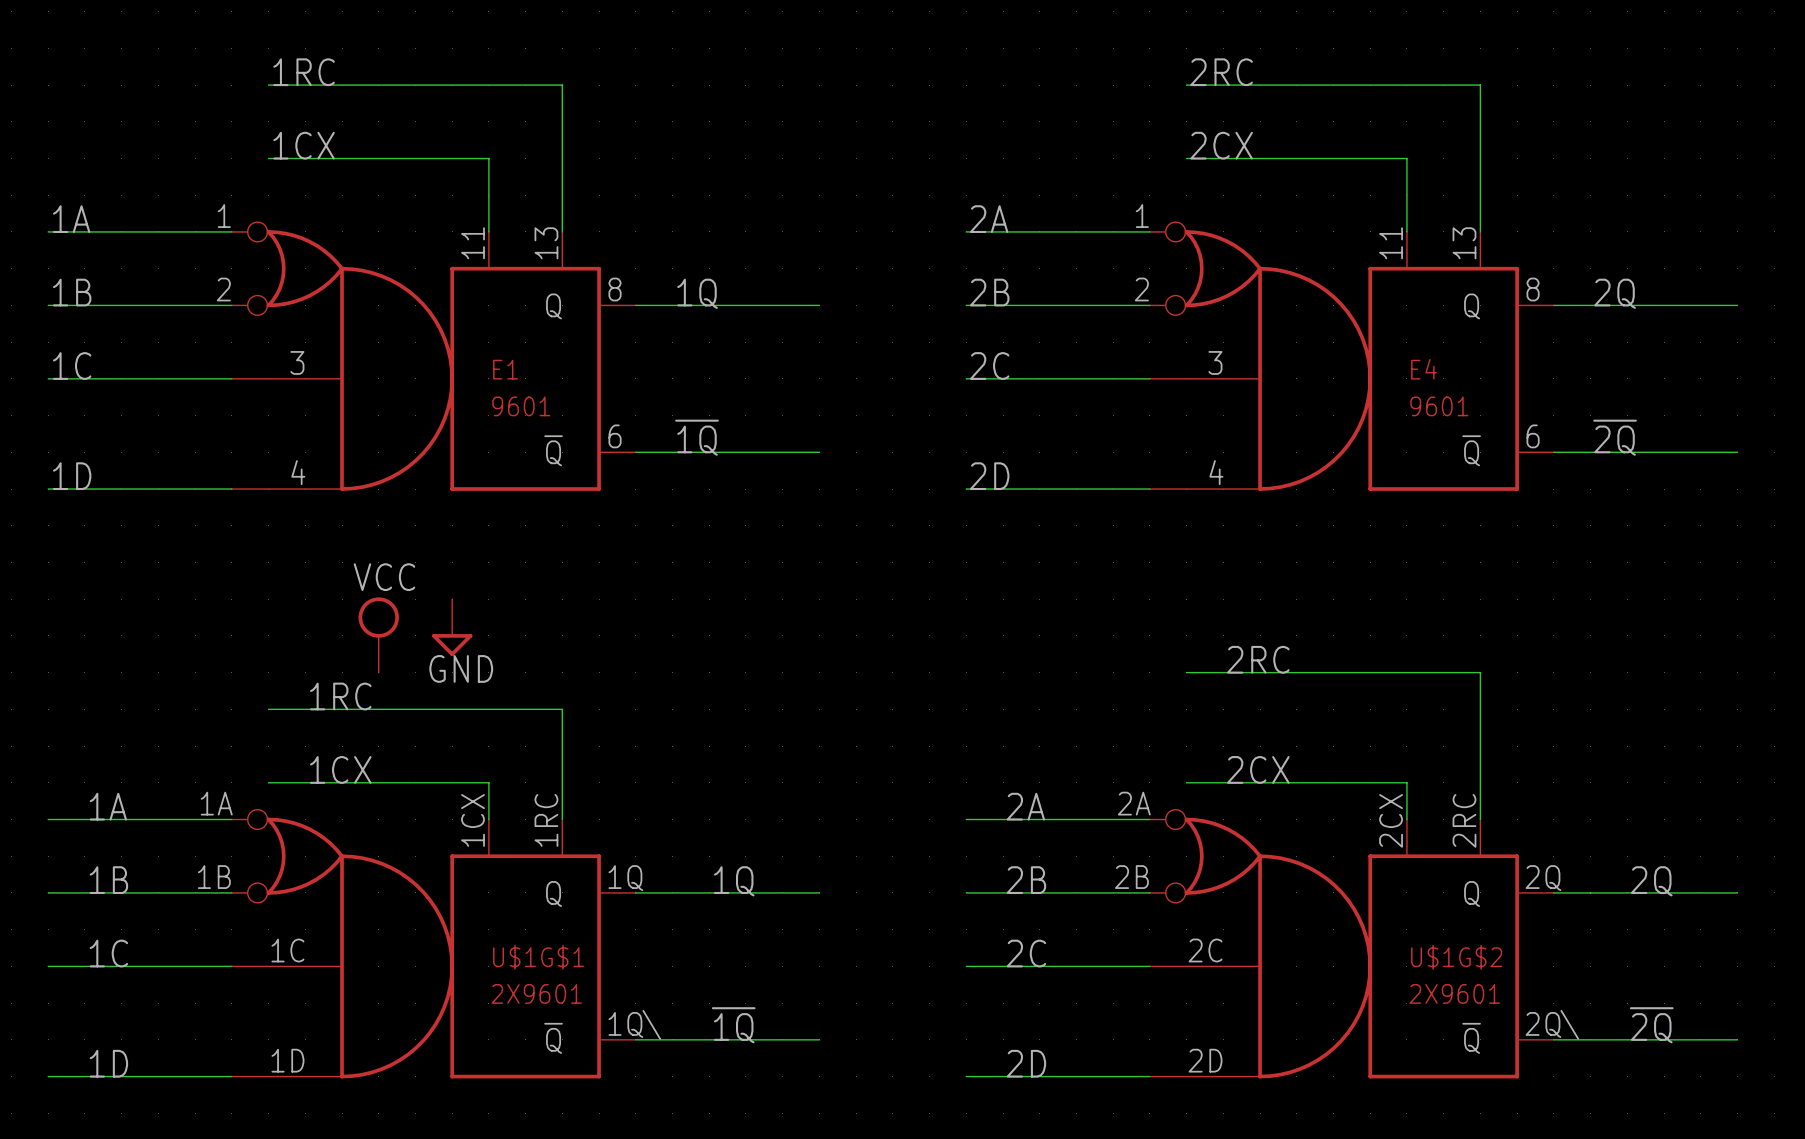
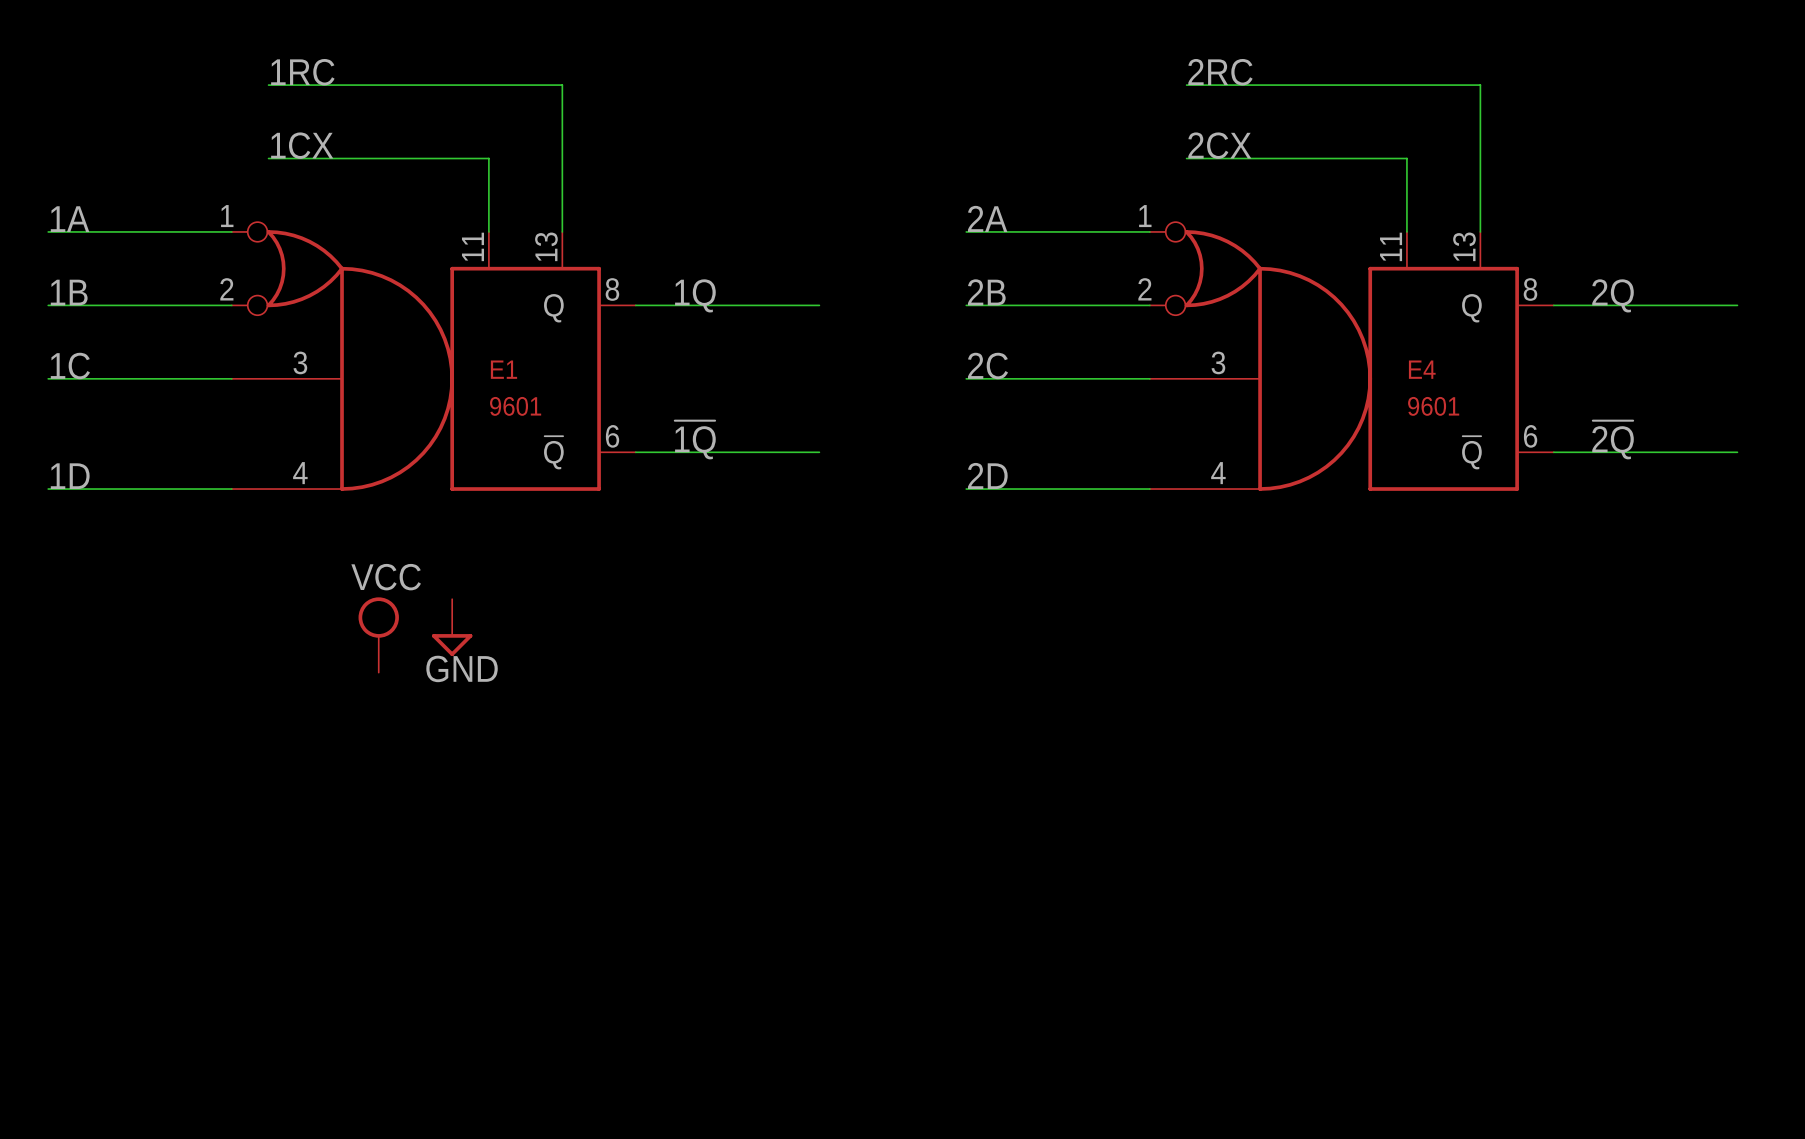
label: 2RC (1258, 659) -> none
wire: (1186, 672) (1480, 672) (1480, 819) -> none
label: 1RC (340, 696) -> none
wire: (268, 709) (562, 709) (562, 819) -> none
label: 1CX (340, 769) -> none
label: 2CX (1258, 769) -> none
wire: (268, 782) (488, 782) (488, 819) -> none
wire: (1186, 782) (1406, 782) (1406, 819) -> none
label: 1A (108, 806) -> none
label: 2A (1025, 806) -> none
wire: (48, 819) (231, 819) -> none
wire: (966, 819) (1149, 819) -> none
label: 1B (108, 880) -> none
label: 2B (1026, 880) -> none
label: 1Q (734, 881) -> none
label: 2Q (1651, 881) -> none
wire: (48, 892) (231, 892) -> none
wire: (635, 892) (819, 892) -> none
wire: (966, 892) (1149, 892) -> none
wire: (1553, 892) (1737, 892) -> none
U$1G$1: 2X9601 (433, 944) -> none
U$1G$2: 2X9601 (1351, 944) -> none
label: 1C (108, 953) -> none
label: 2C (1026, 953) -> none
wire: (48, 966) (231, 966) -> none
wire: (966, 966) (1149, 966) -> none
label: ~{1Q} (733, 1025) -> none
label: ~{2Q} (1651, 1025) -> none
wire: (635, 1039) (819, 1039) -> none
wire: (1553, 1039) (1737, 1039) -> none
label: 1D (108, 1063) -> none
label: 2D (1026, 1063) -> none
wire: (48, 1076) (231, 1076) -> none
wire: (966, 1076) (1149, 1076) -> none

